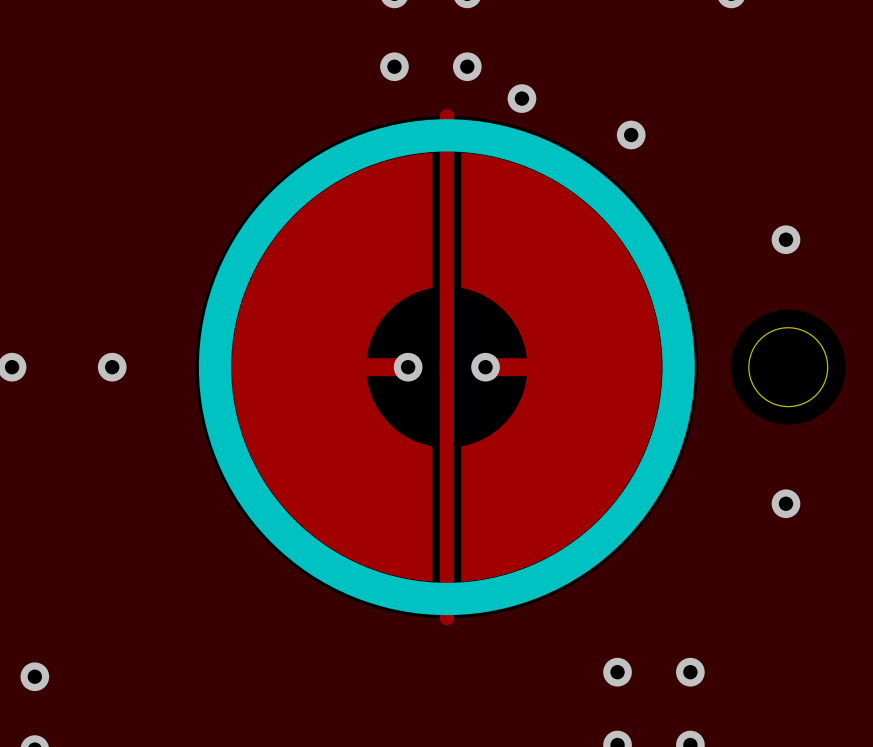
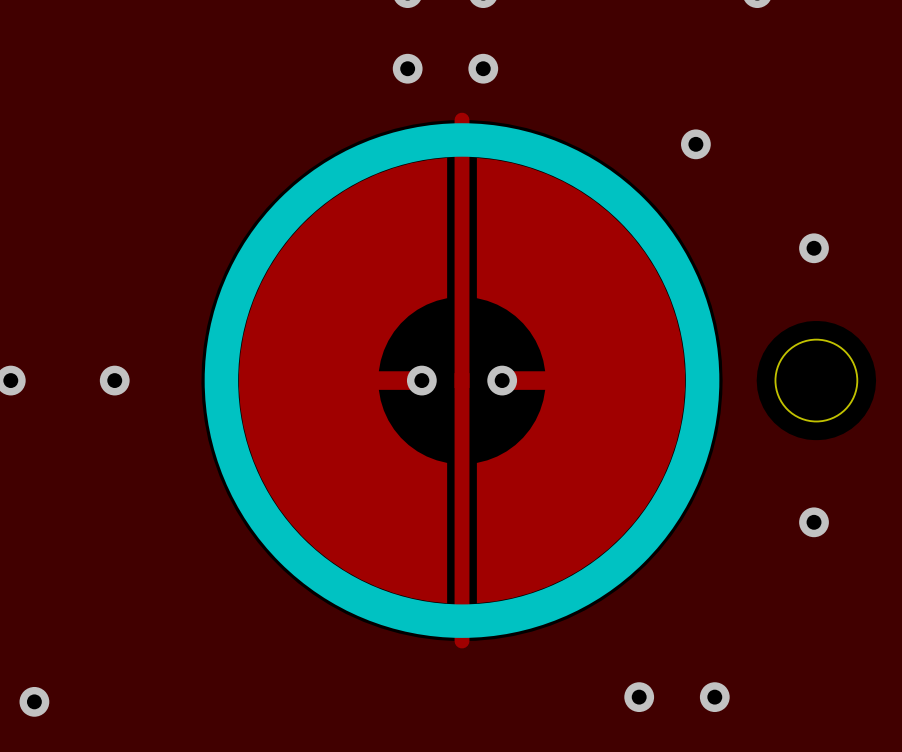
via: (521, 98) -> none
via position: (631, 135) -> (695, 144)

